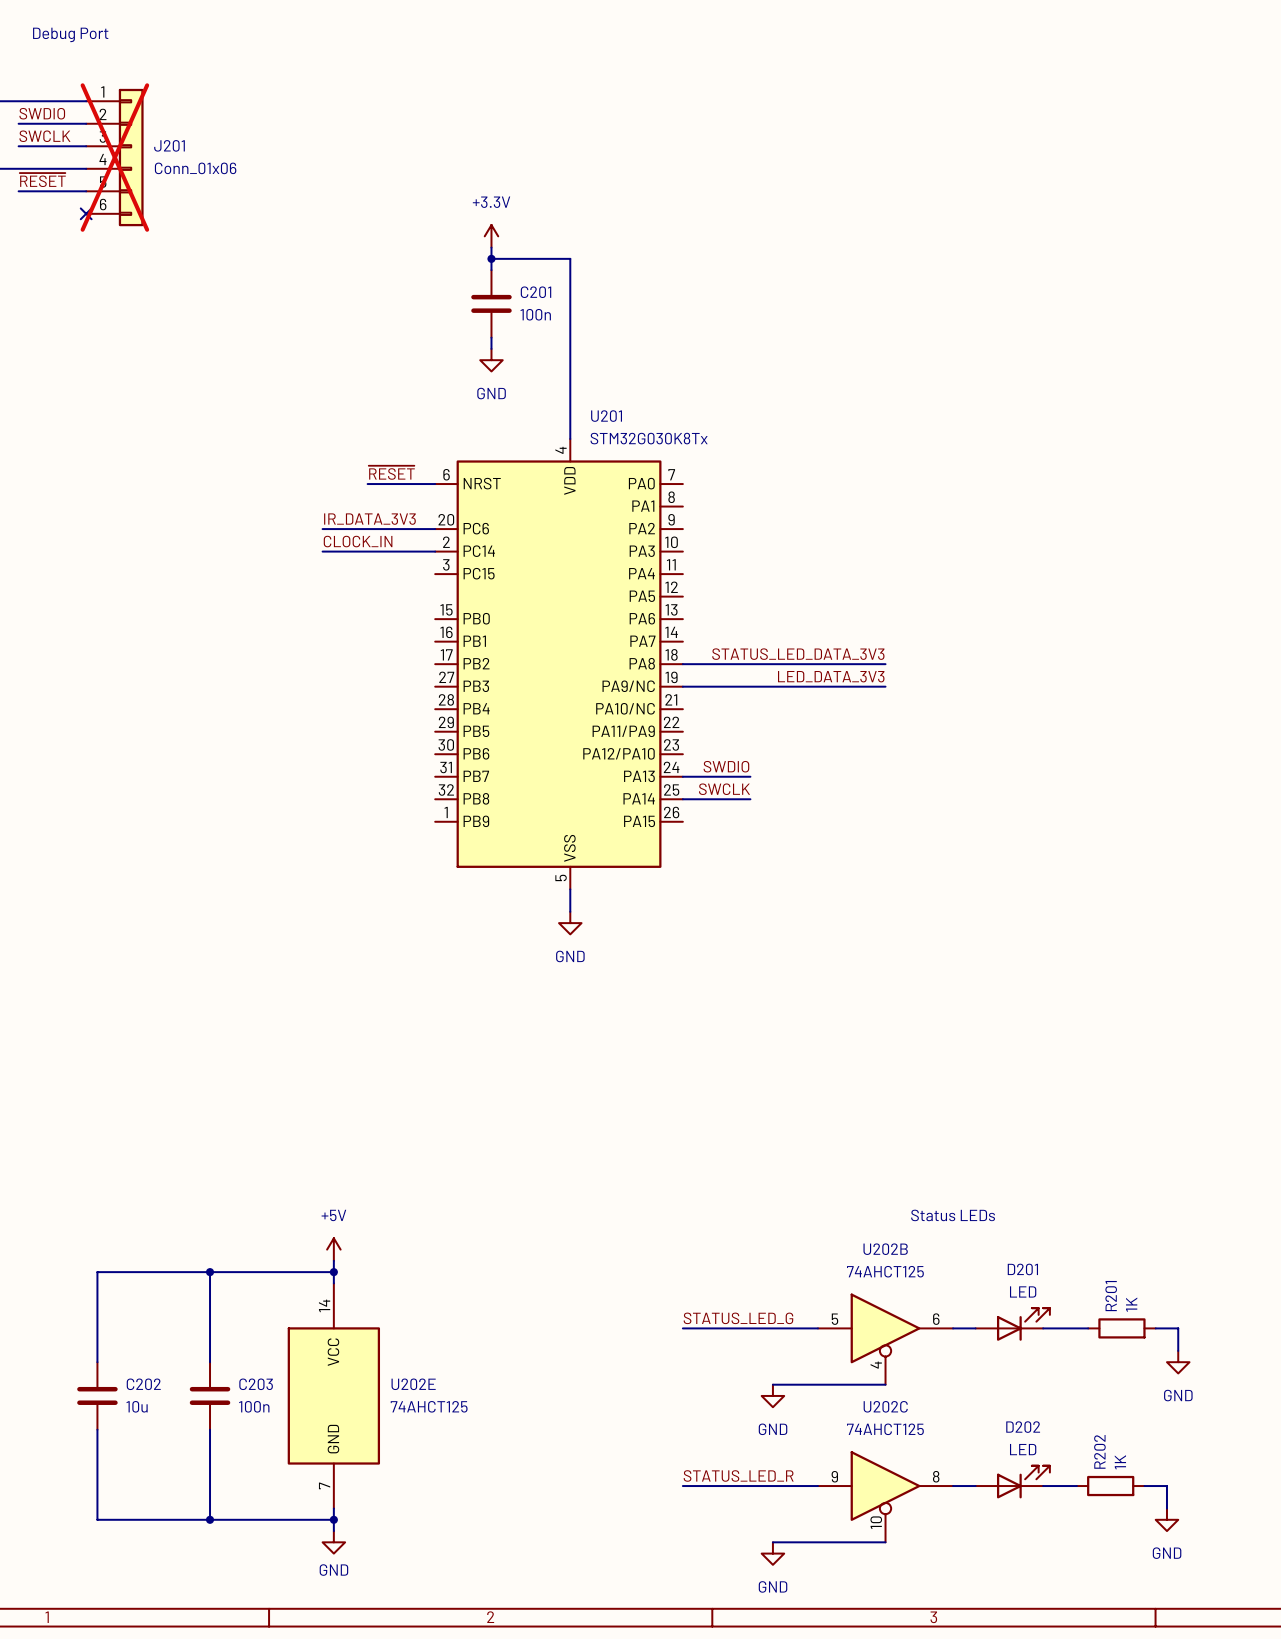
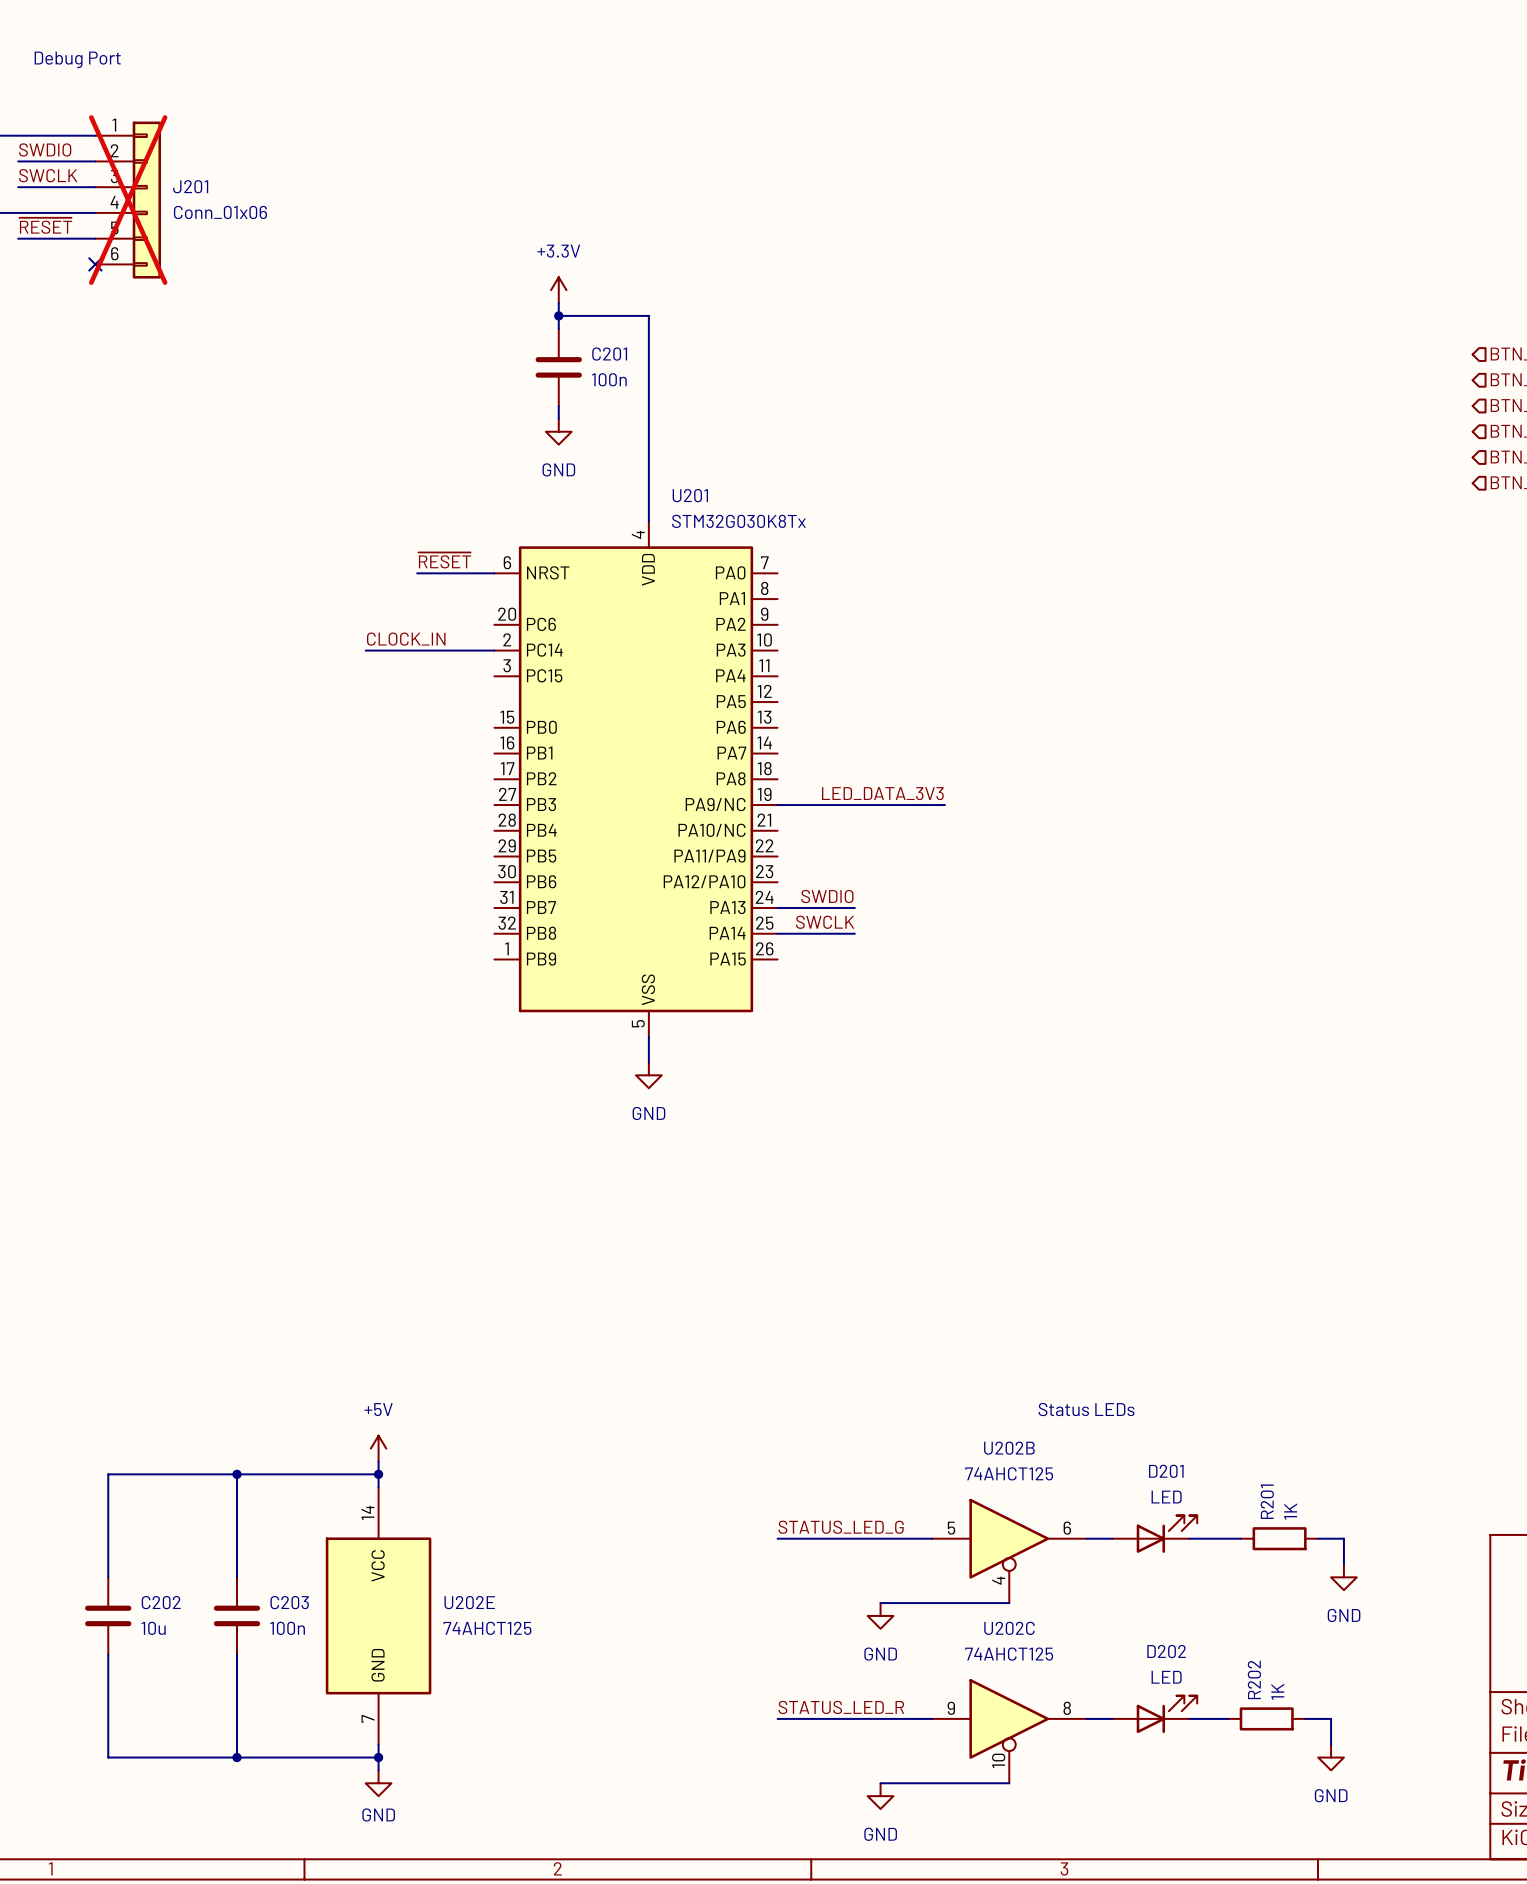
label: IR_DATA_3V3 (369, 519) -> none
wire: (322, 529) (435, 529) -> none
label: STATUS_LED_DATA_3V3 (798, 654) -> none
wire: (682, 664) (885, 664) -> none
label position: LED_DATA_3V3 (831, 676) -> LED_DATA_3V3 (882, 793)
wire: (829, 686) (885, 686) -> none

